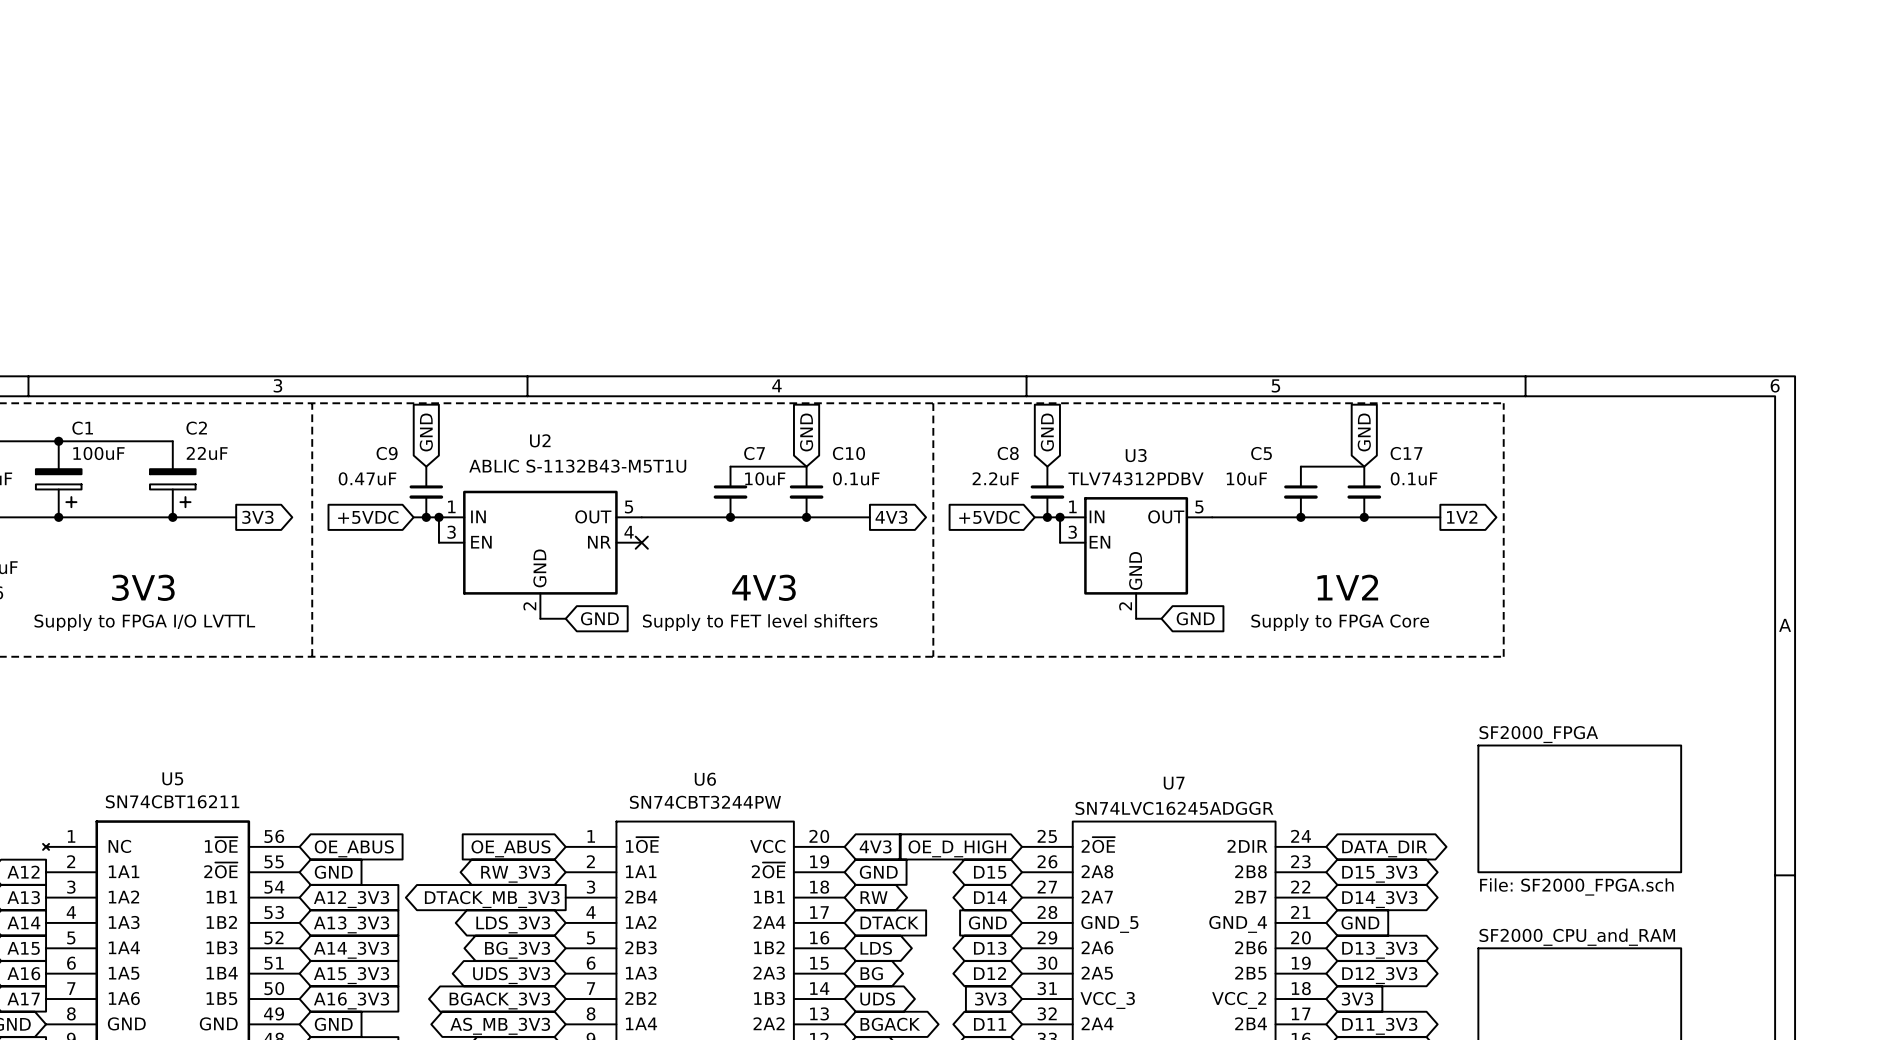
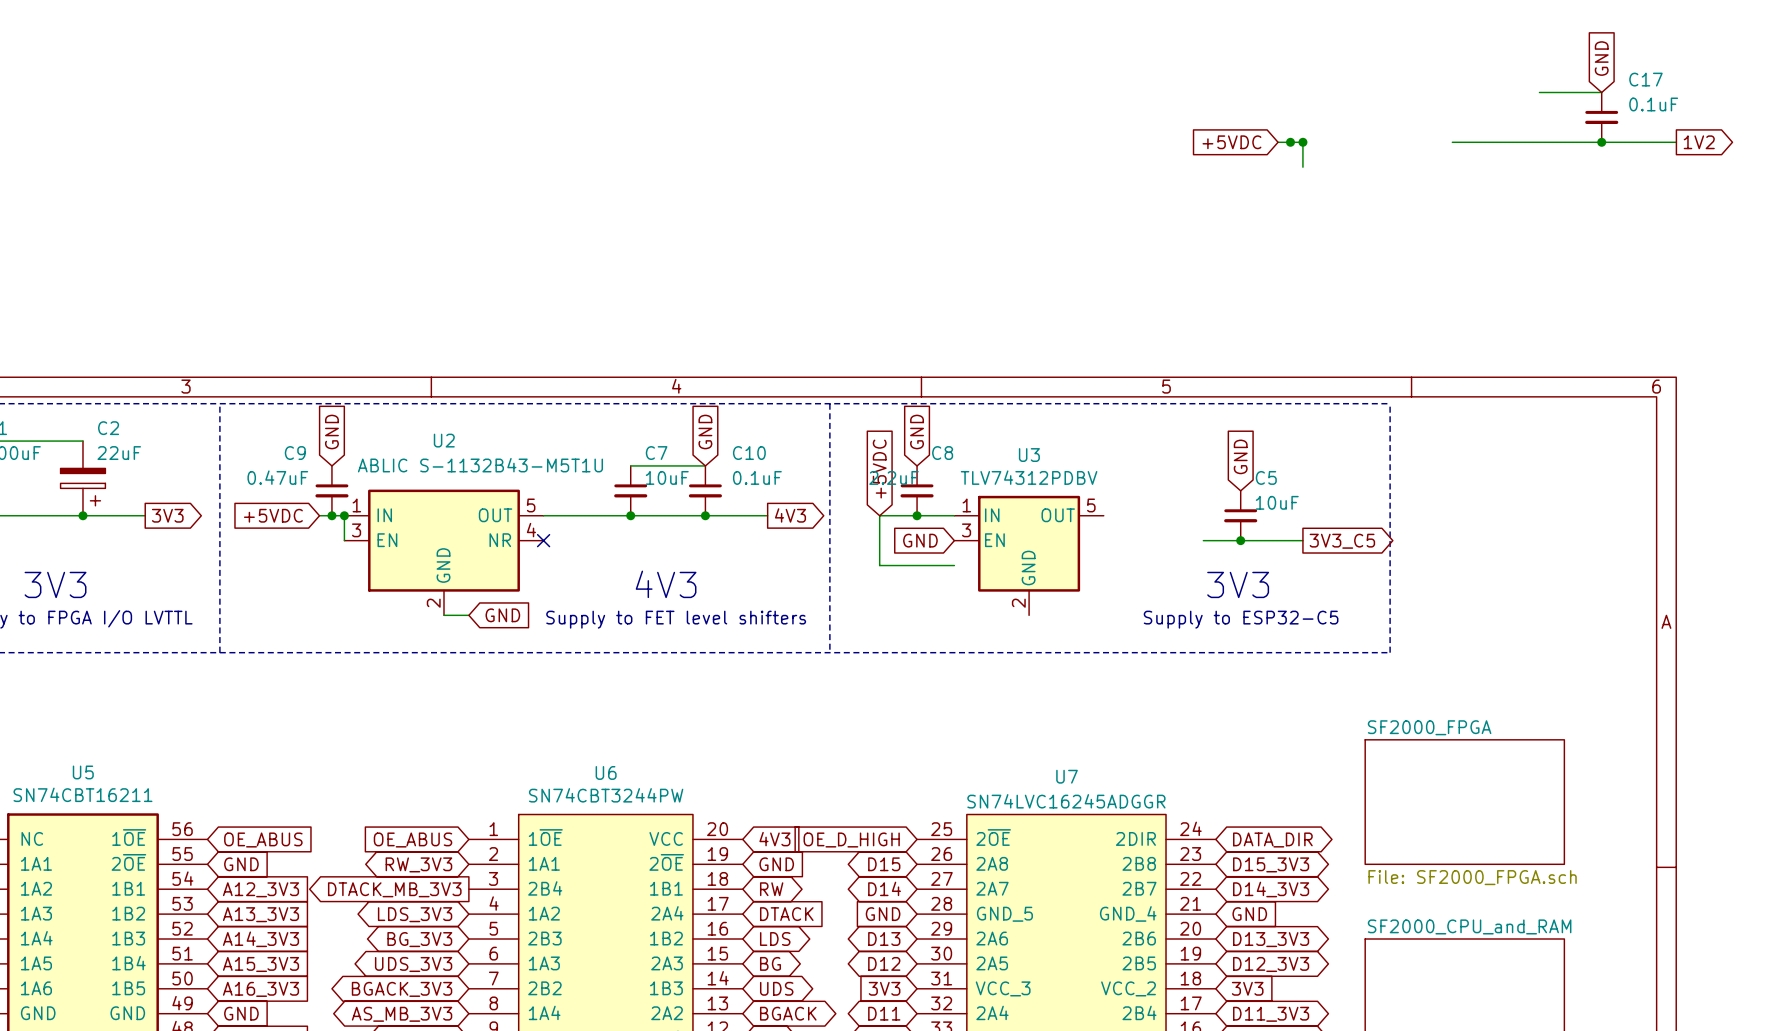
global label: none -> GND (1601, 58)
wire: none -> (1539, 92) (1601, 92)
global label: none -> 1V2 (1699, 142)
global label: none -> +5VDC (1231, 142)
wire: none -> (1278, 142) (1302, 142) (1302, 167)
junction: none -> (1290, 142)
junction: none -> (1302, 142)
wire: none -> (1452, 142) (1676, 142)
junction: none -> (1601, 142)
global label position: GND (1047, 432) -> GND (917, 432)
global label position: GND (1364, 432) -> GND (1240, 456)
C8 name position: C8 (1008, 453) -> C8 (942, 453)
C5 name position: C5 (1261, 453) -> C5 (1266, 477)
wire: (1300, 466) (1364, 466) -> none
C5 value position: 10uF (1246, 478) -> 10uF (1277, 502)
C8 position: (1047, 491) -> (917, 490)
C5 position: (1300, 491) -> (1240, 515)
C17 position: (1364, 491) -> (1601, 117)
global label rotation: 0° (989, 517) -> 90° clockwise (879, 469)
junction: none -> (917, 515)
wire: none -> (929, 515) (879, 515) (879, 565) (954, 565)
junction: (1047, 517) -> none
wire: (1060, 517) (1060, 542) -> none
junction: (1060, 517) -> none
wire: (1212, 517) (1440, 517) -> none
junction: (1300, 517) -> none
junction: (1364, 517) -> none
global label: 1V2 (1462, 517) -> none
global label: none -> GND (920, 540)
wire: none -> (1203, 540) (1302, 540)
junction: none -> (1240, 540)
global label: none -> 3V3_C5 (1342, 541)
text: 1V2 (1347, 587) -> 3V3 (1238, 584)
wire: (1136, 618) (1161, 618) -> none
global label: GND (1195, 618) -> none
text: Supply to FPGA Core (1340, 622) -> Supply to ESP32-C5 (1241, 619)

